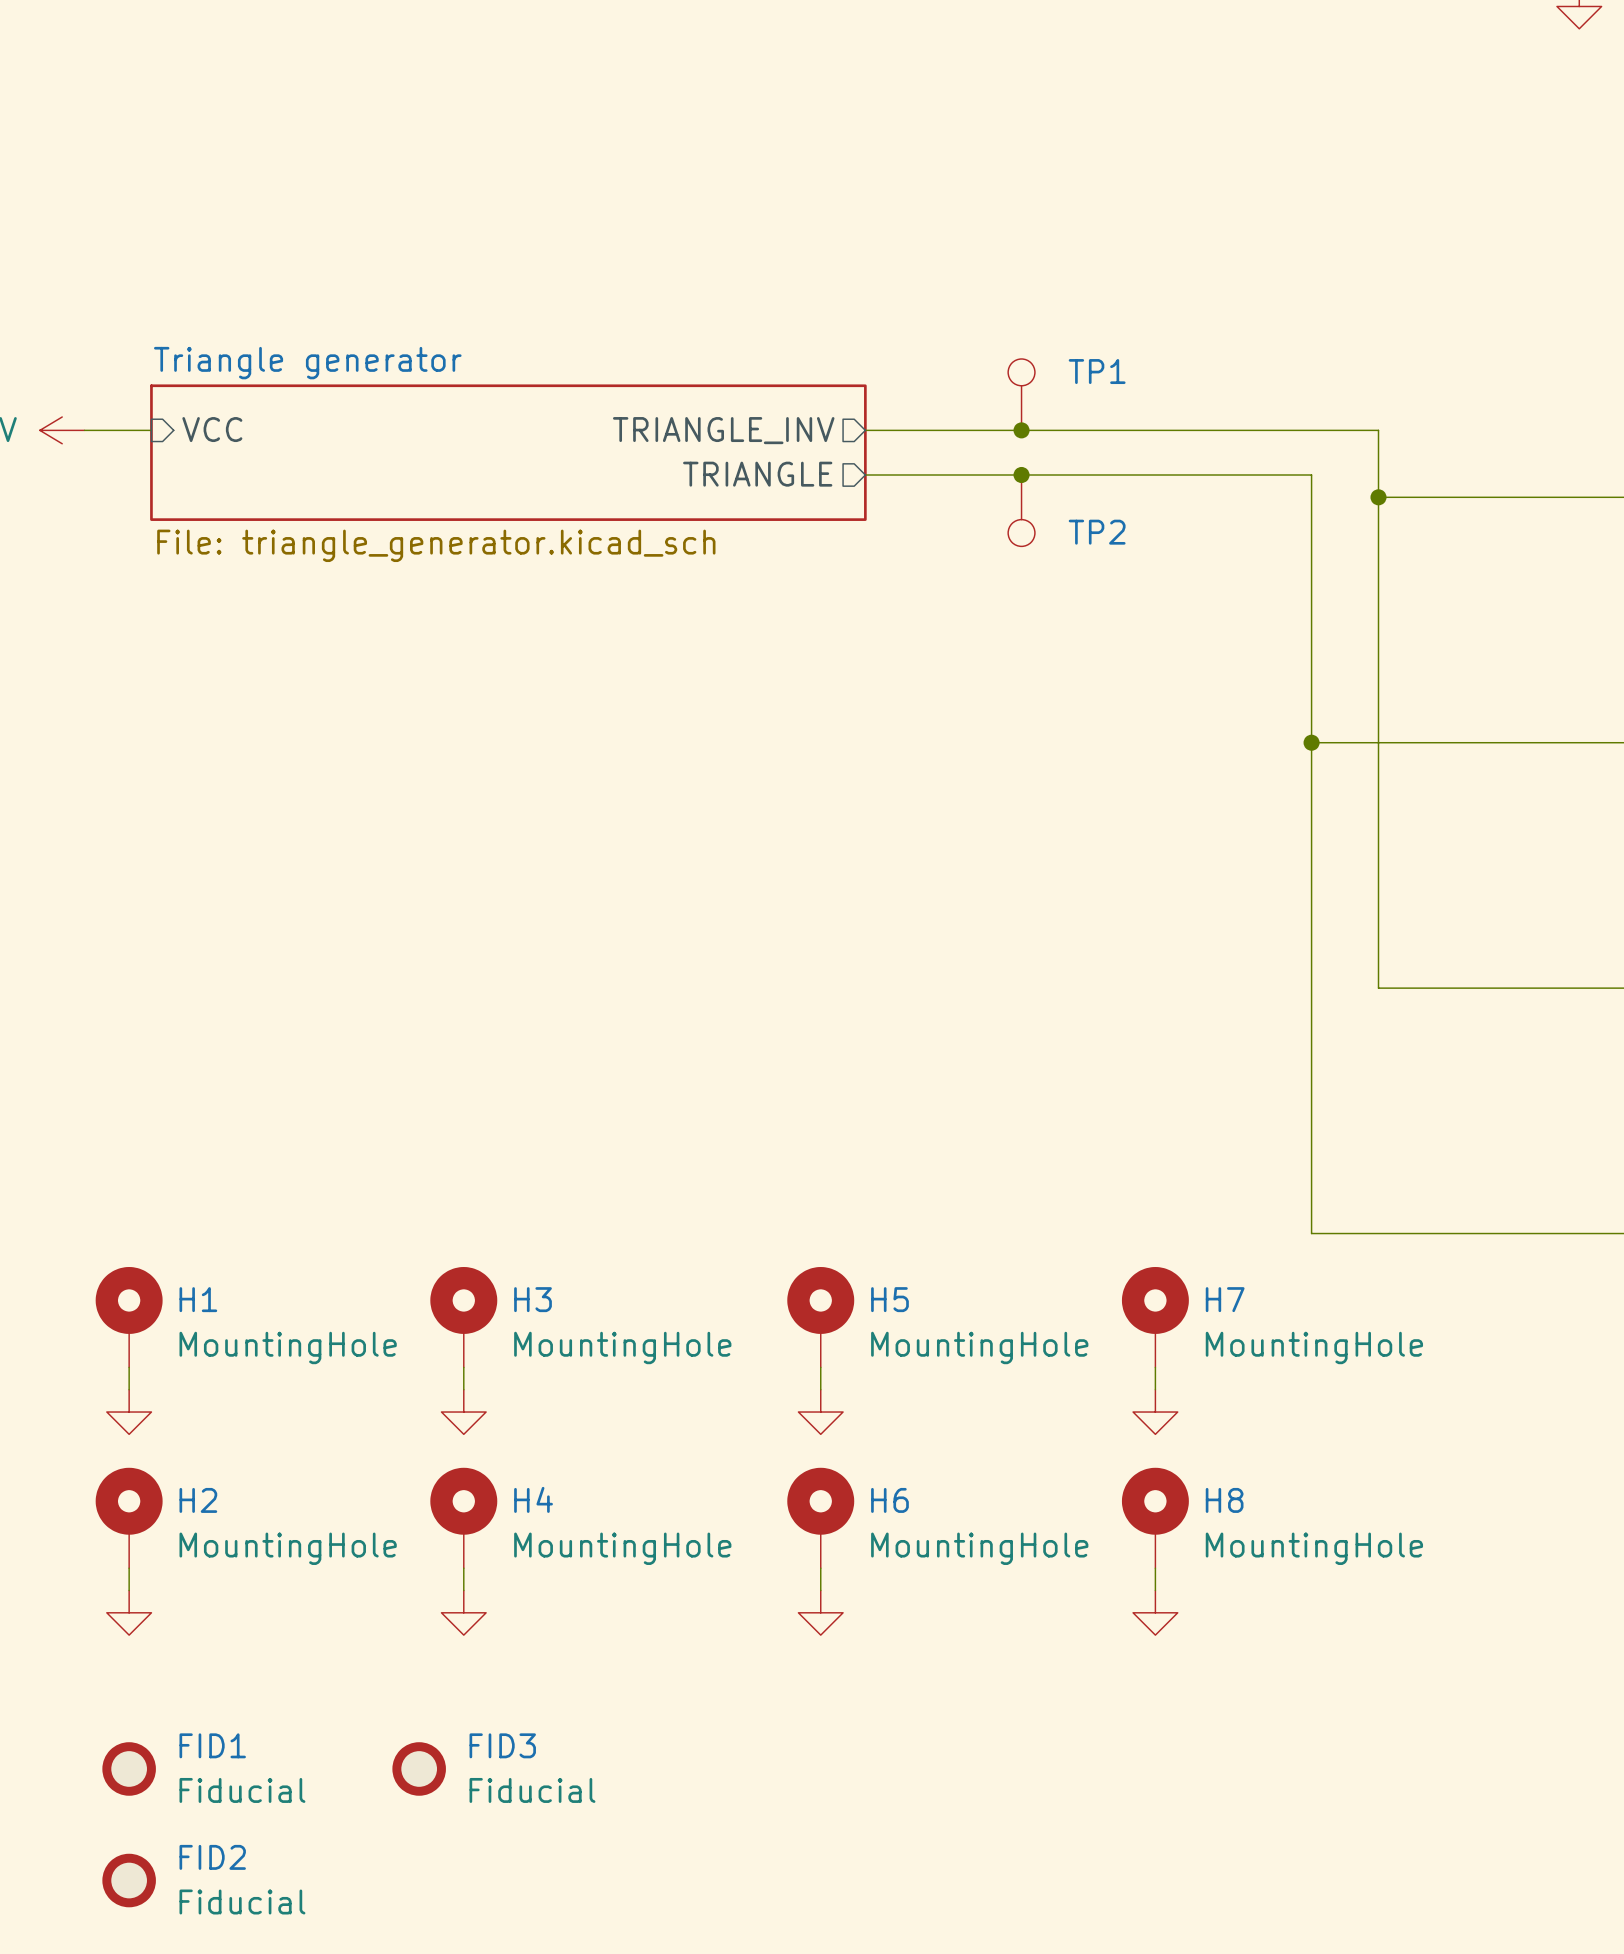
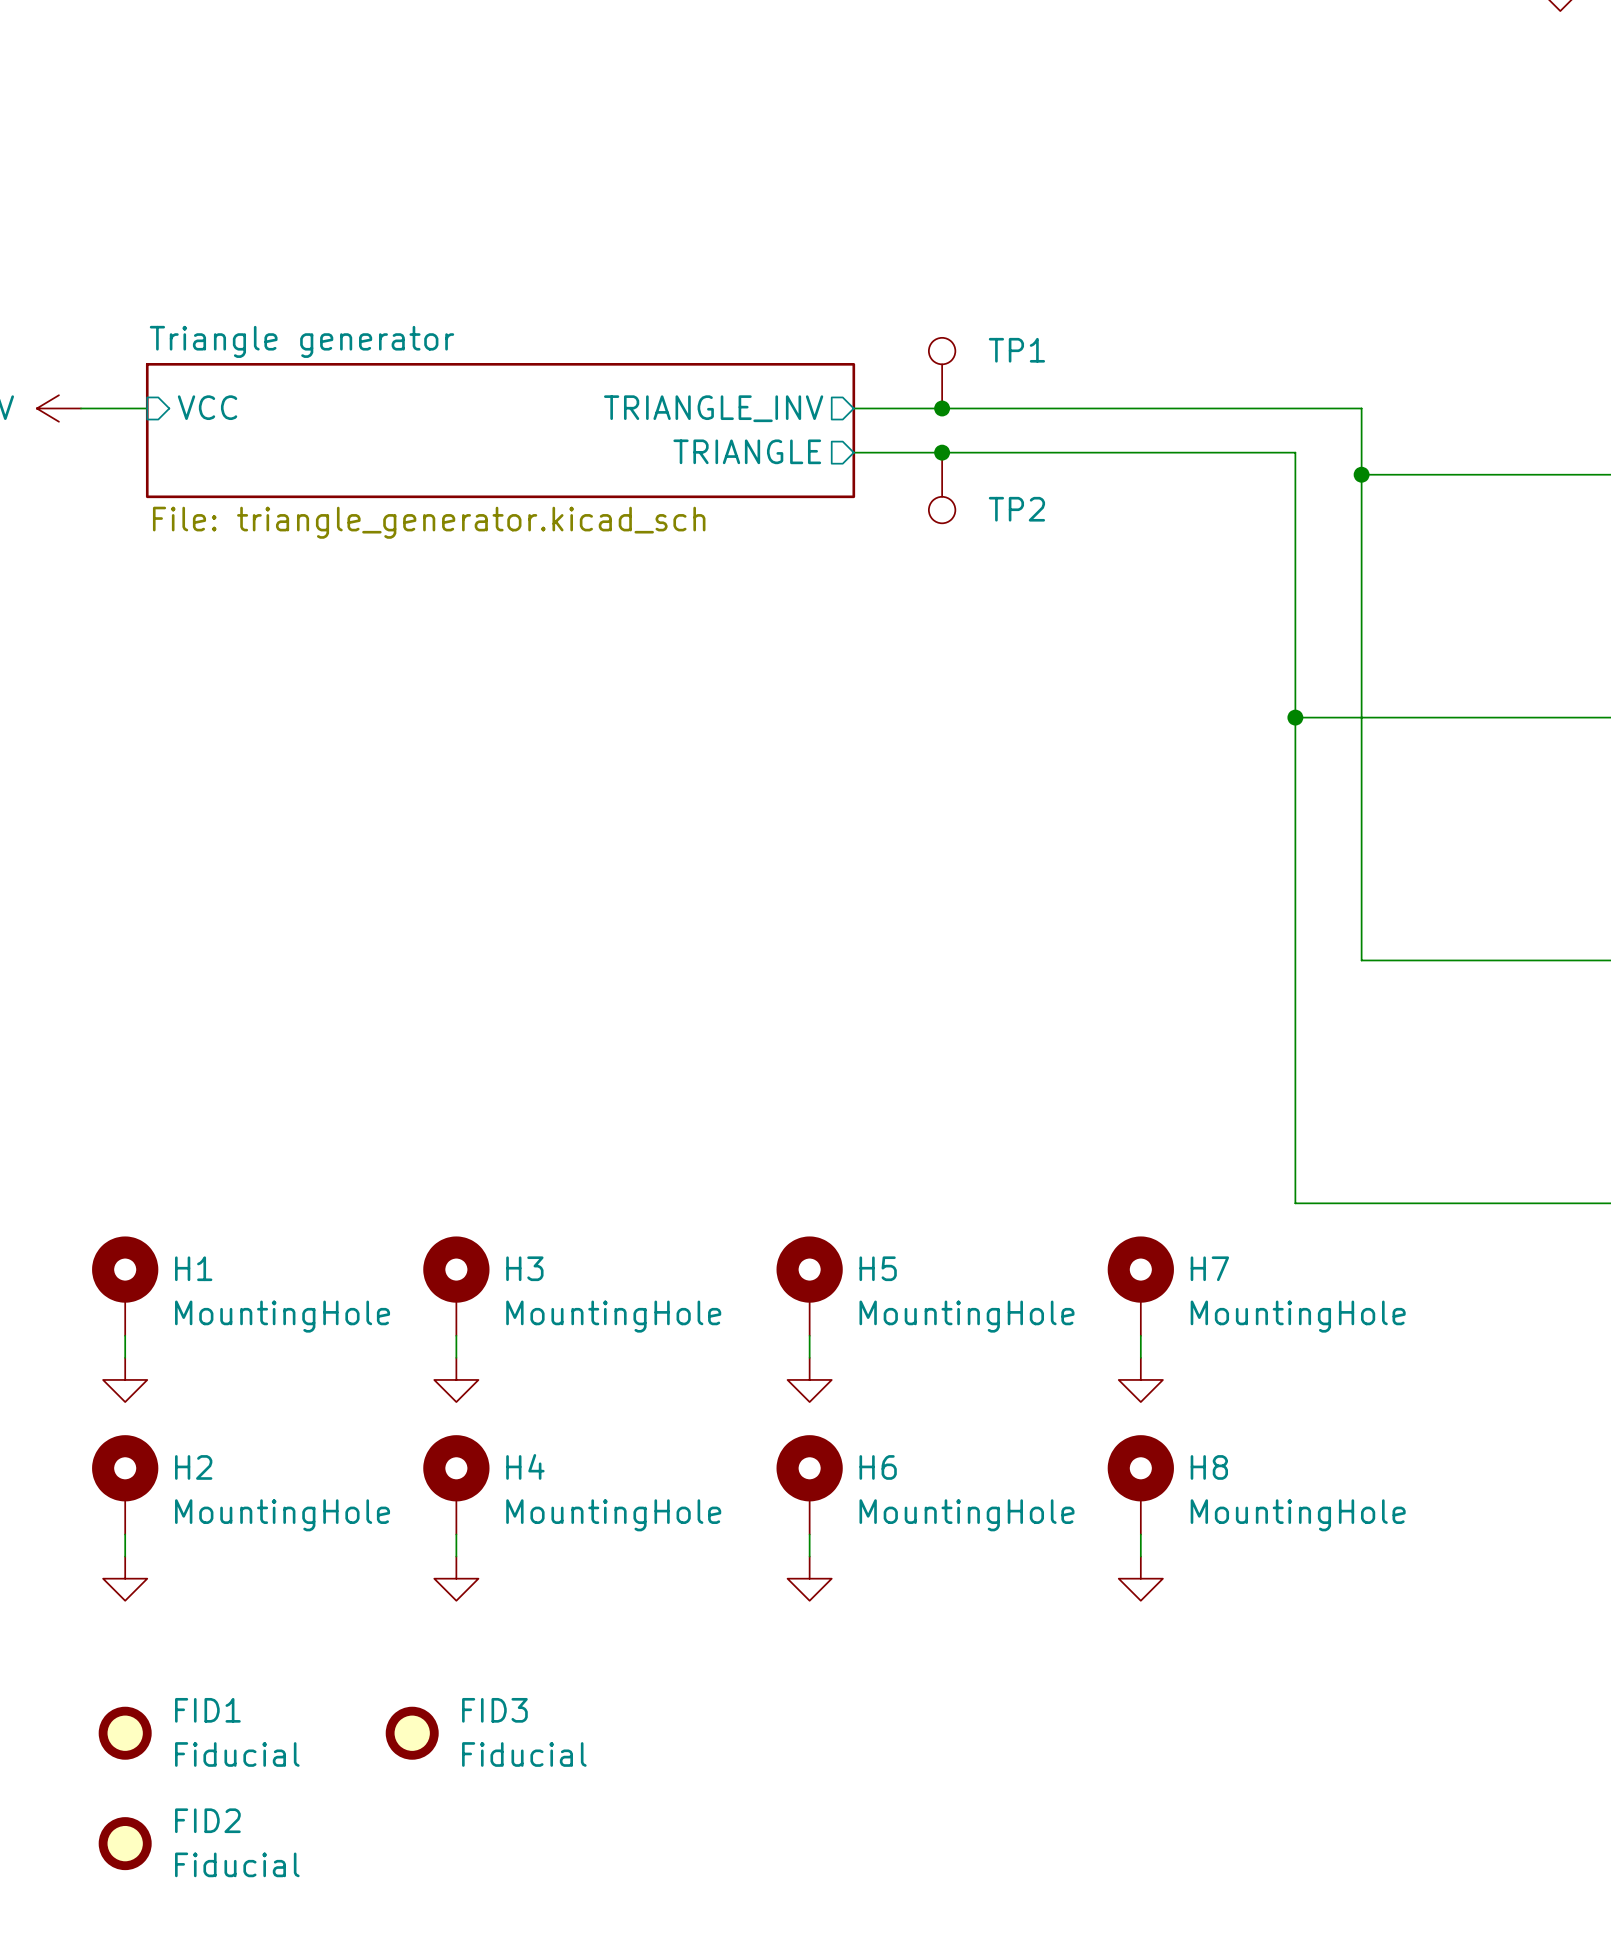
TP1 position: (1021, 394) -> (942, 373)
junction: none -> (942, 408)
junction: (1021, 430) -> none
junction: none -> (942, 452)
junction: (1021, 474) -> none
TP2 position: (1021, 510) -> (942, 487)

